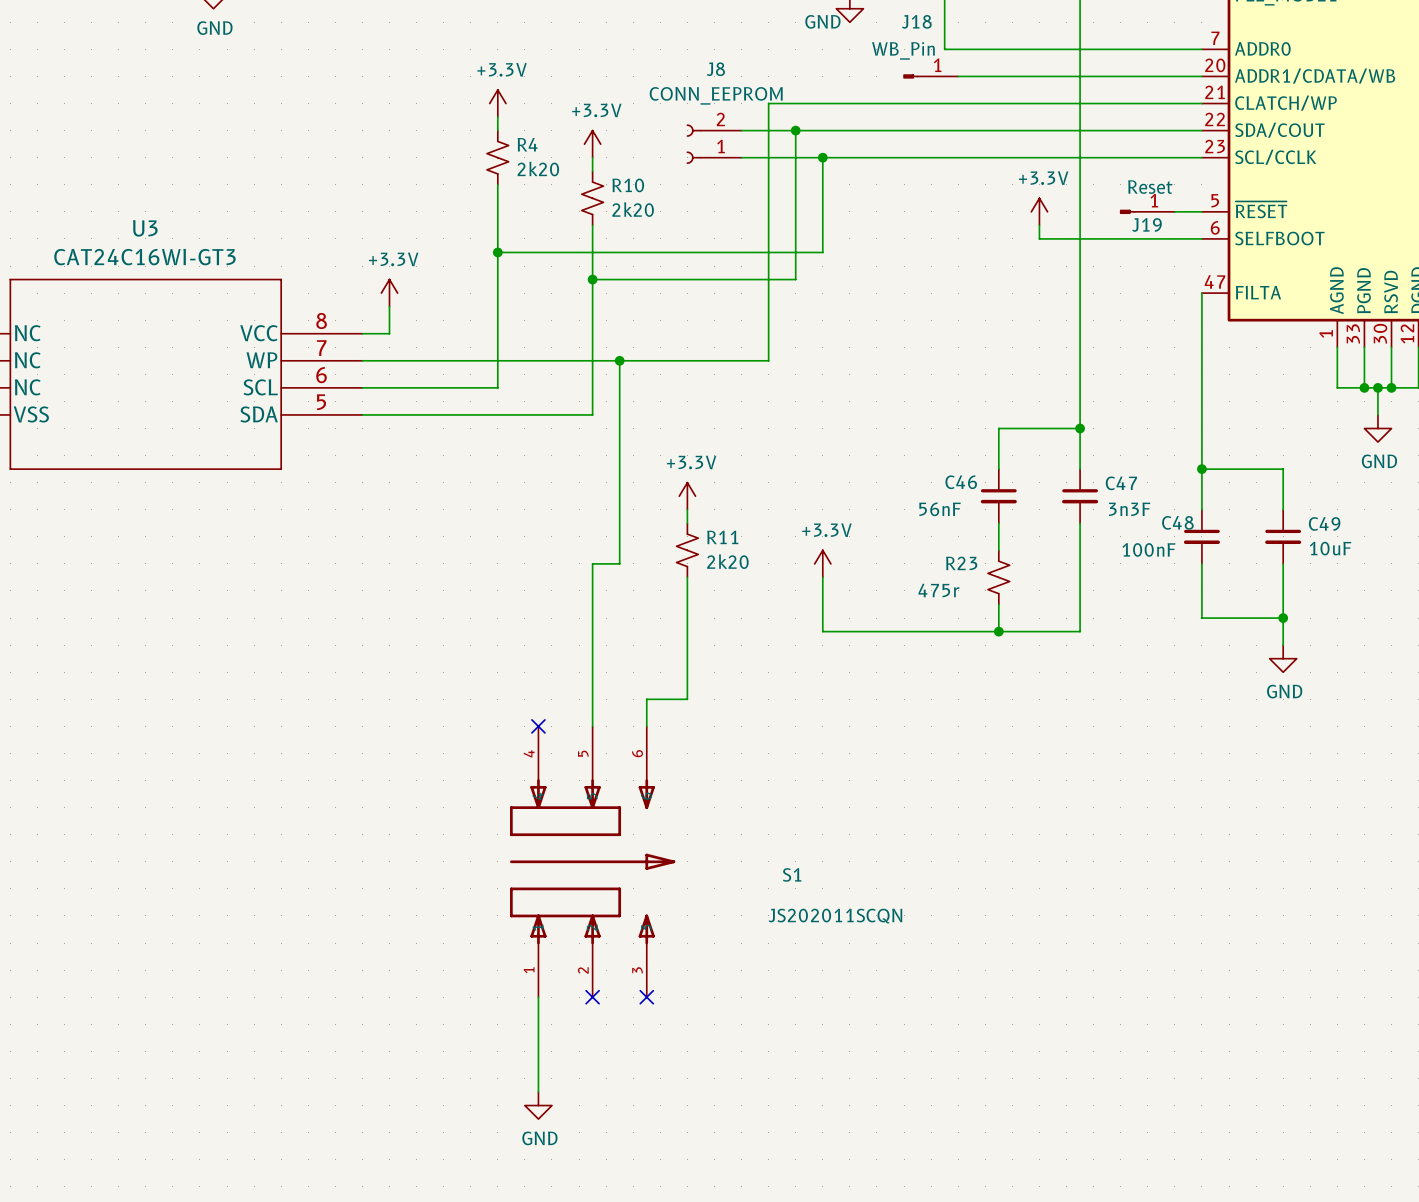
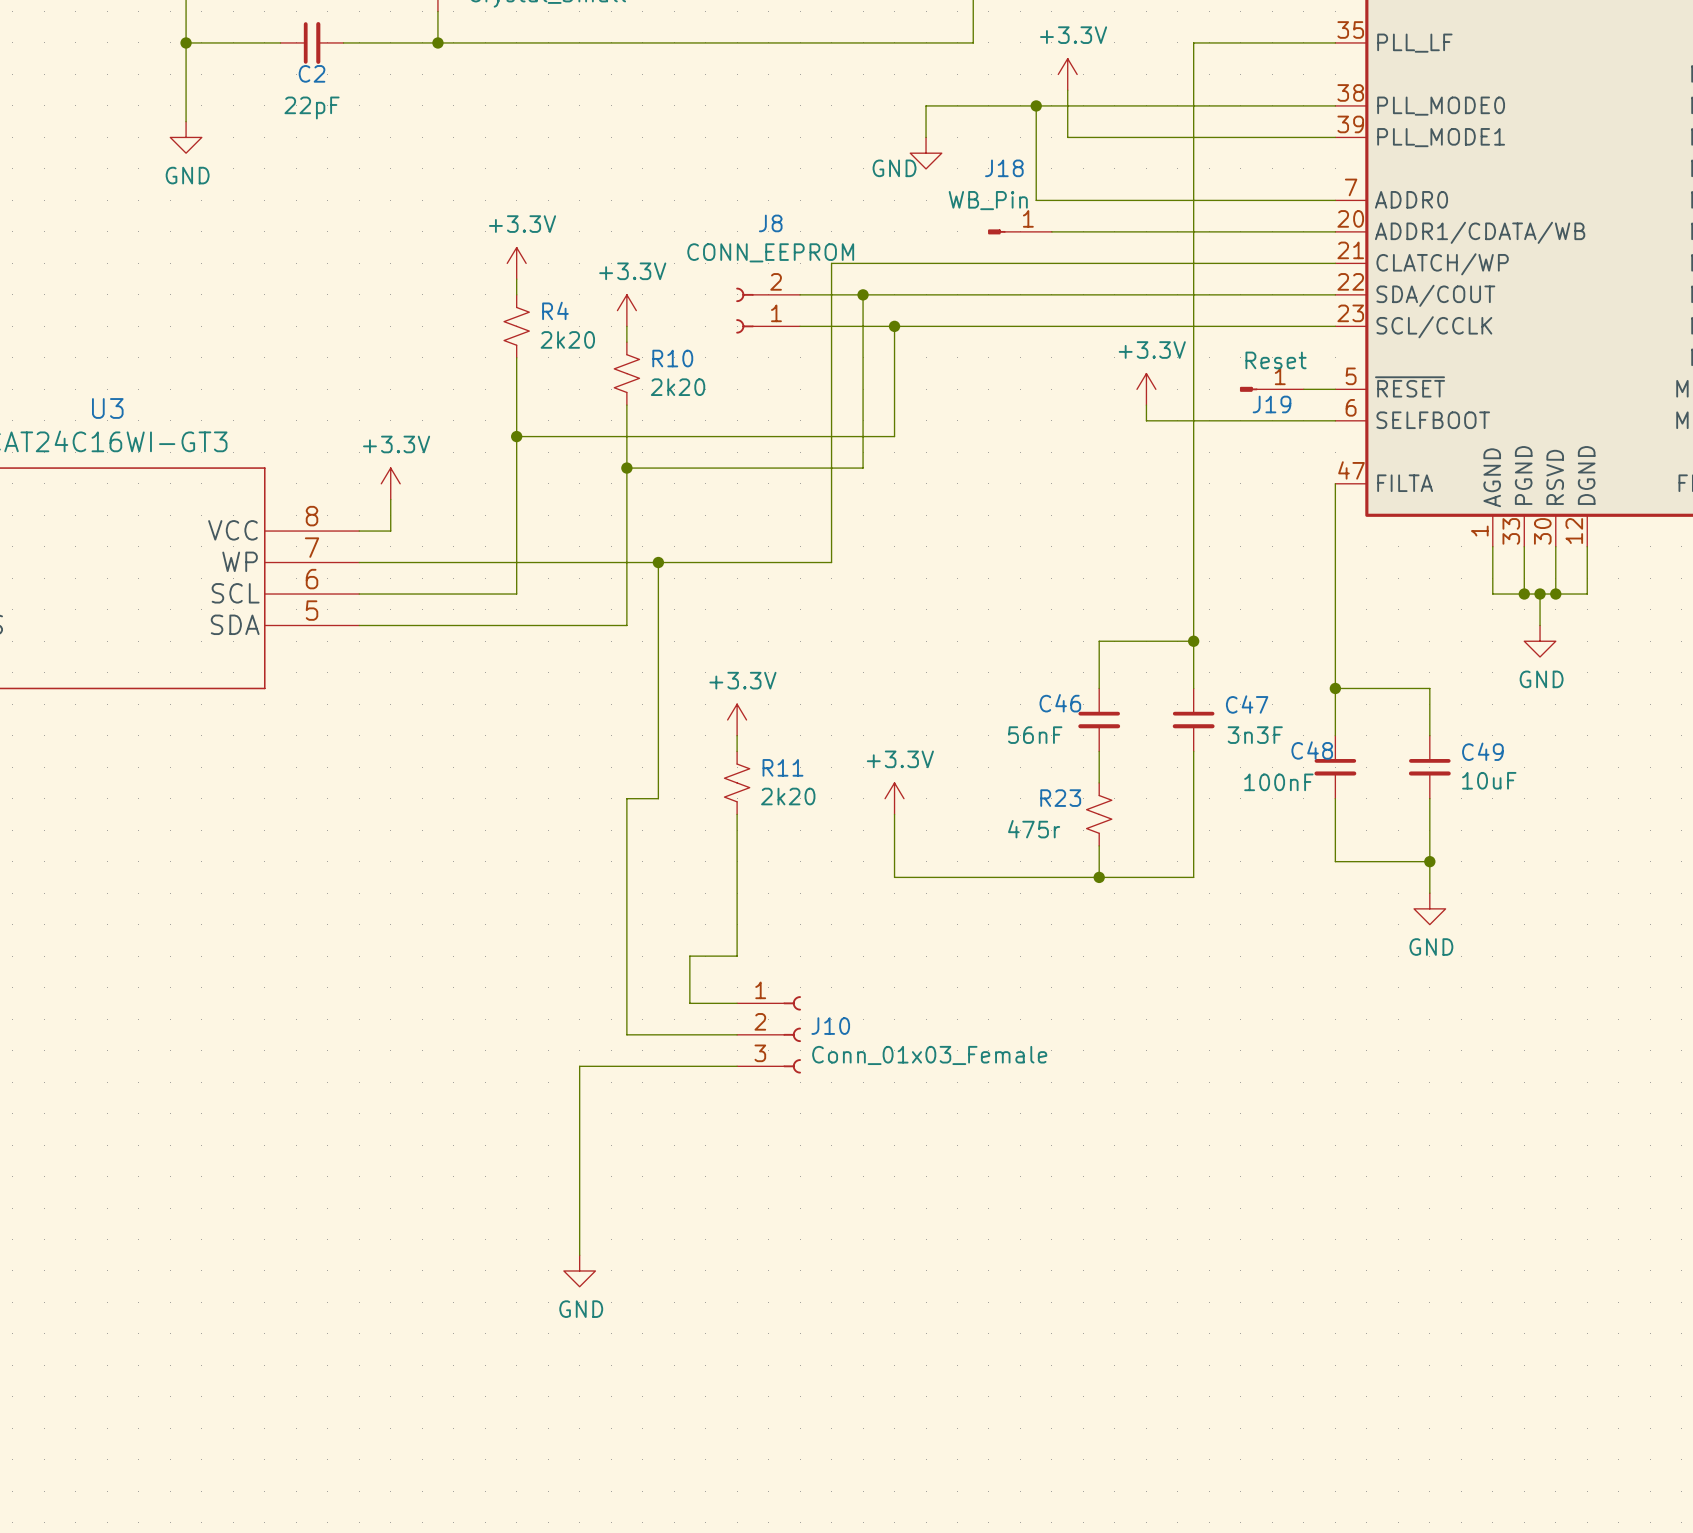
no-connect mark: (538, 726) -> none
wire: none -> (626, 987) (626, 1034) (737, 1034)
wire: none -> (689, 987) (689, 1003) (737, 1003)
J10: none -> Conn_01x03_Female (769, 1034)
wire: none -> (737, 1066) (579, 1066) (579, 1255)
S1: JS202011SCQN (592, 861) -> none
wire: (538, 997) (538, 1091) -> none
no-connect mark: (592, 997) -> none
no-connect mark: (646, 997) -> none
power symbol position: GND (538, 1105) -> GND (579, 1270)

